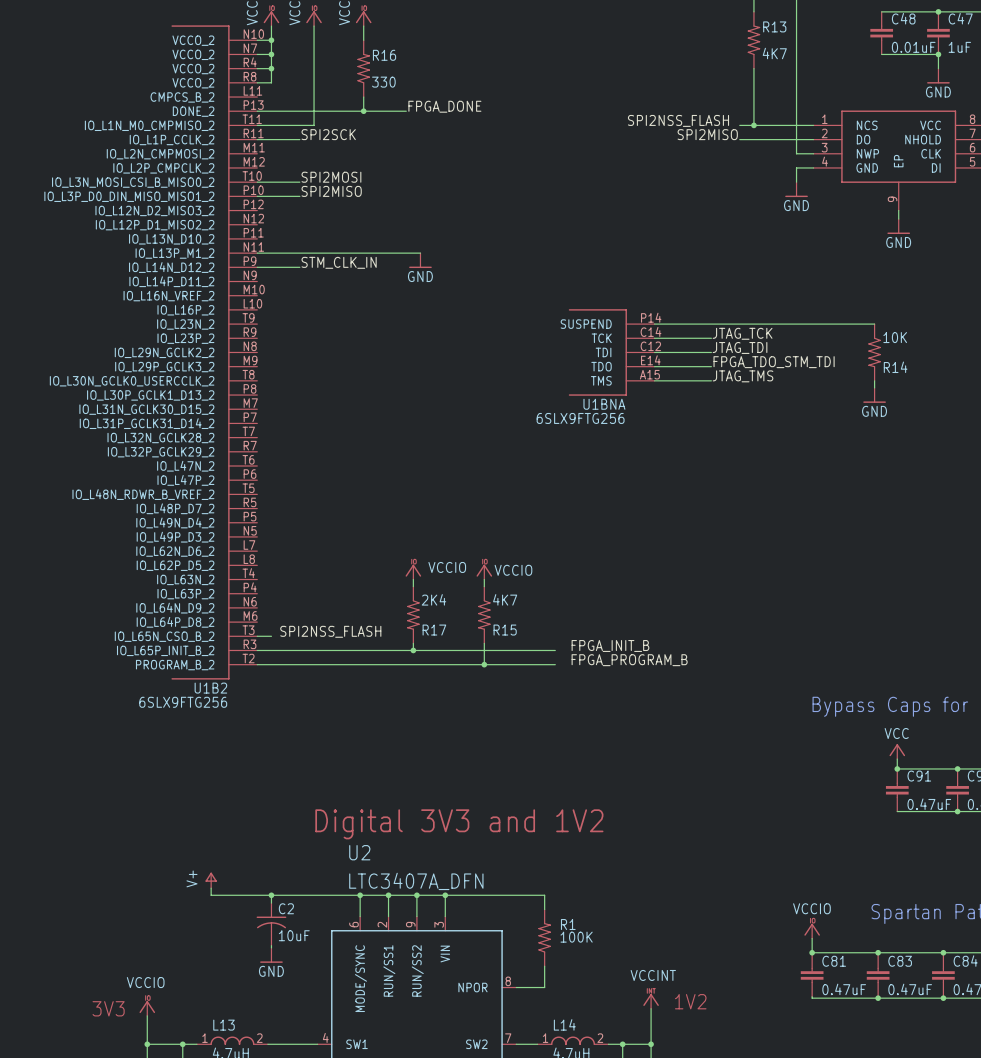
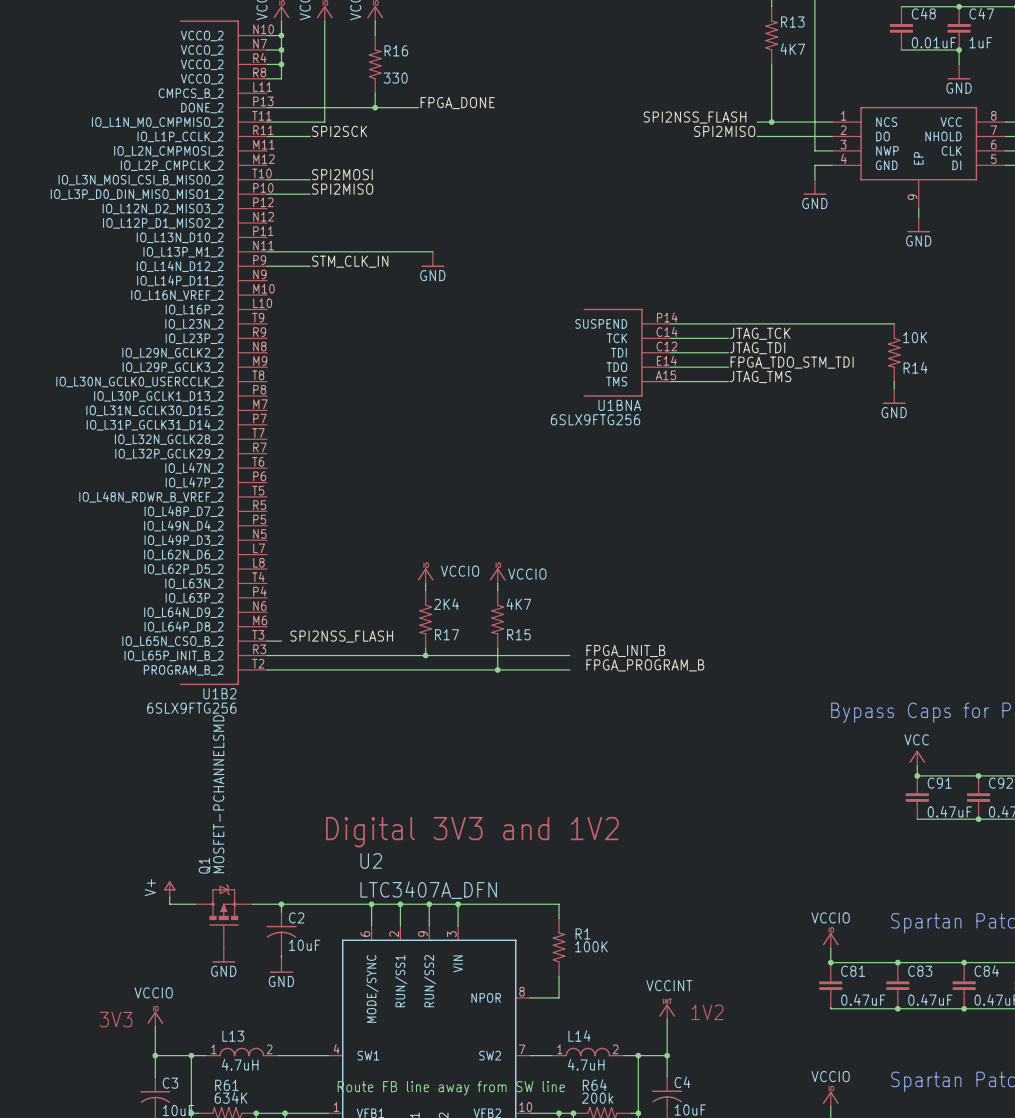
power symbol position: V+ (211, 880) -> V+ (169, 889)
wire: none -> (169, 897) (169, 904) (194, 904)
Q1: none -> MOSFET-PCHANNELSMD (223, 915)
power symbol: none -> GND (223, 955)

